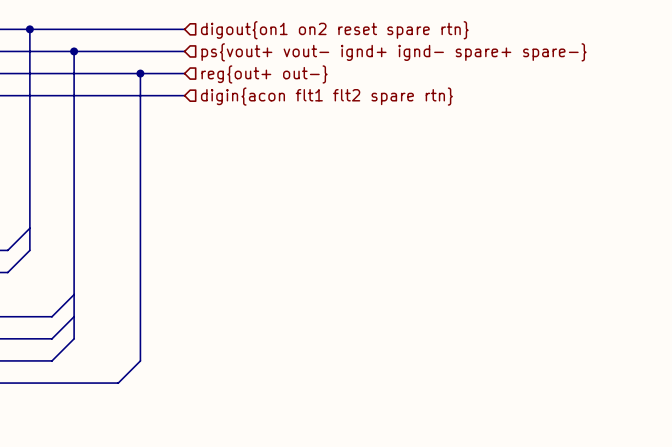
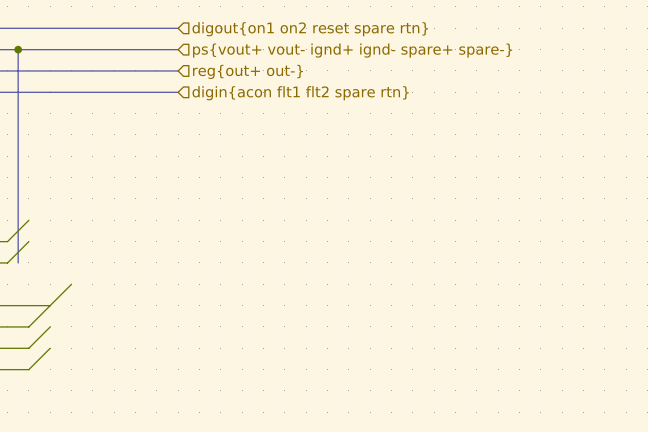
bus: (29, 29) (29, 250) -> (18, 49) (18, 262)
junction position: (29, 29) -> (18, 49)
bus: (74, 51) (74, 338) -> none
junction: (74, 51) -> none
bus: (140, 73) (140, 360) -> none
junction: (140, 73) -> none
wire: (74, 316) (51, 338) (29, 338) -> (50, 305) (28, 326)
wire: (74, 338) (51, 360) (29, 360) -> (50, 326) (28, 348)
wire: (140, 360) (118, 383) (29, 383) -> (50, 348) (28, 369)

